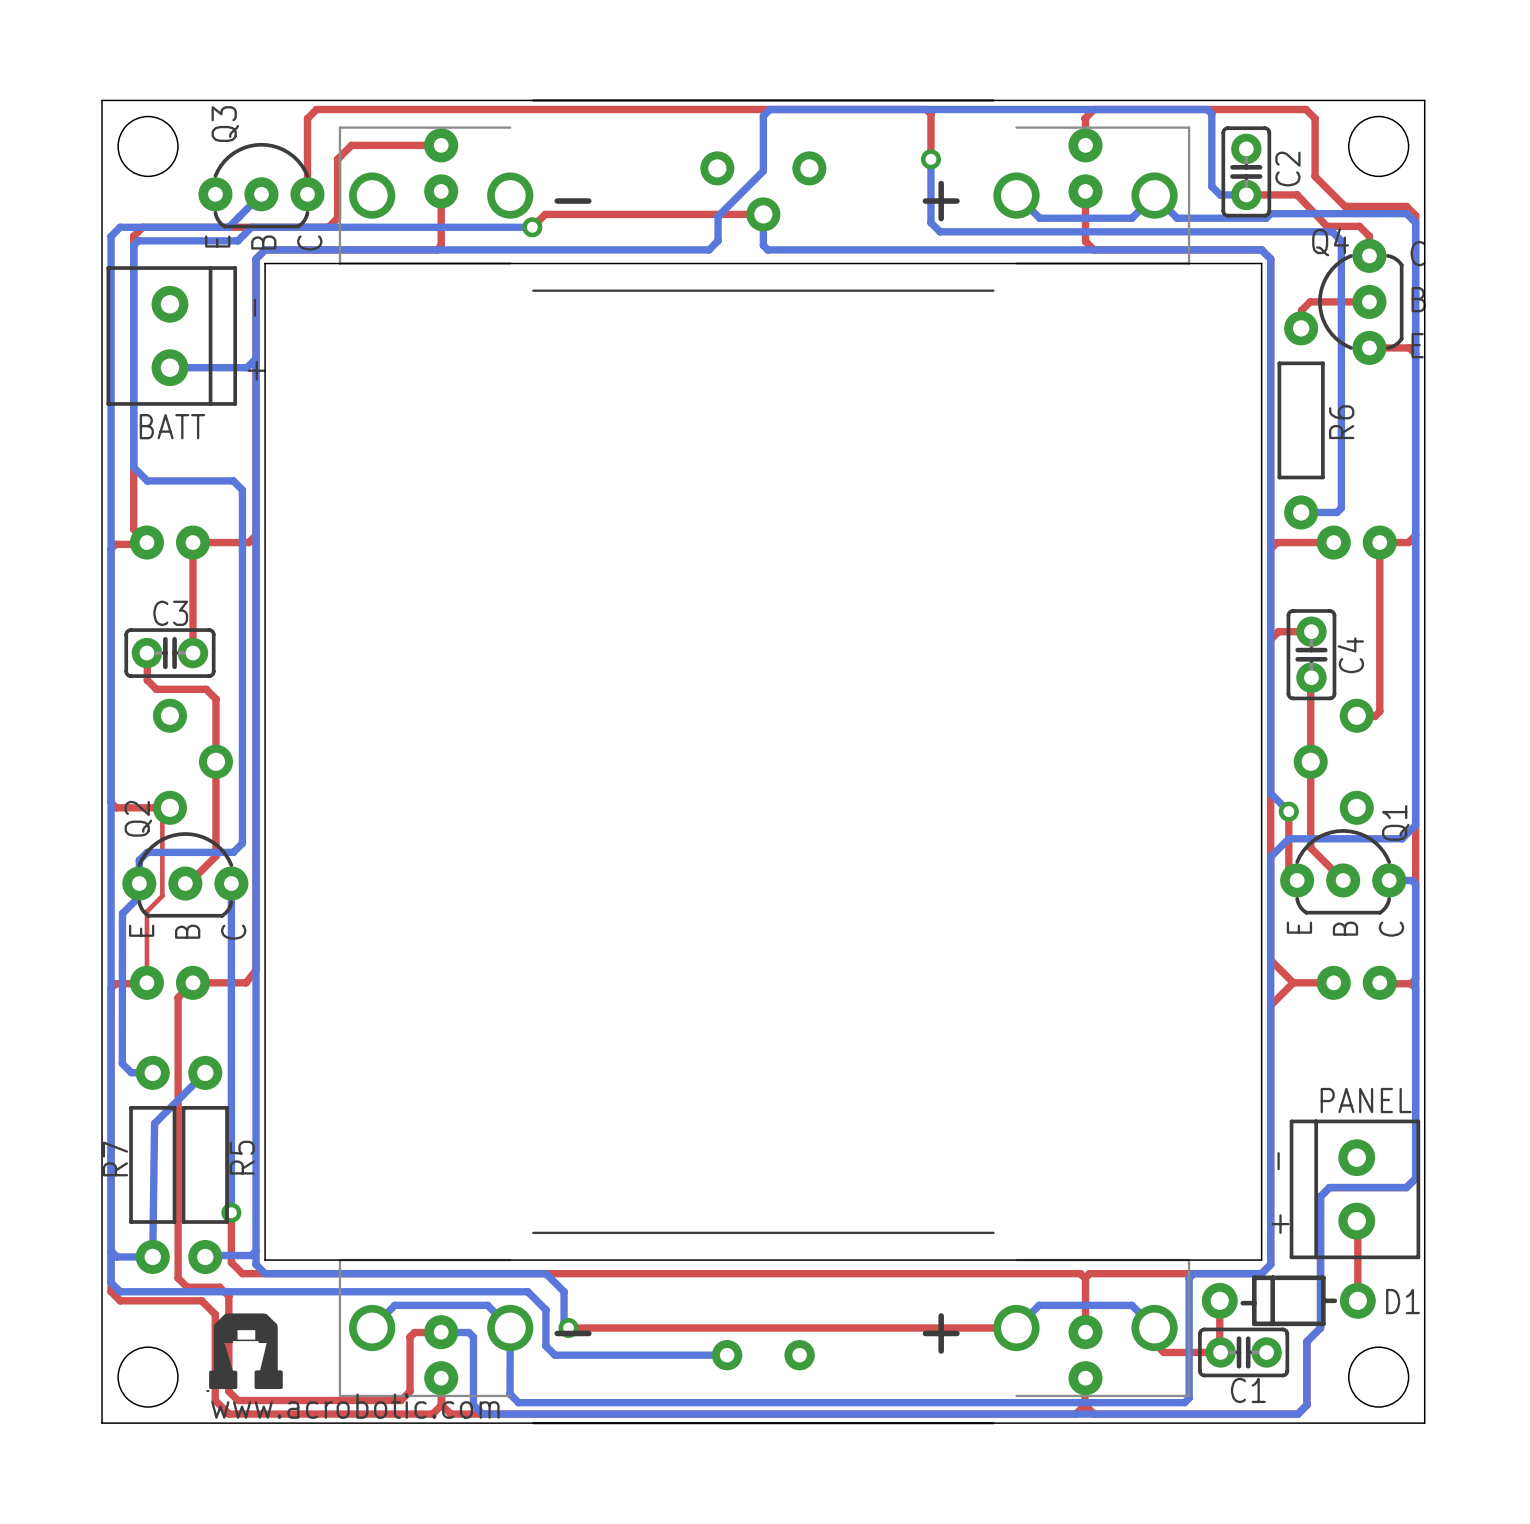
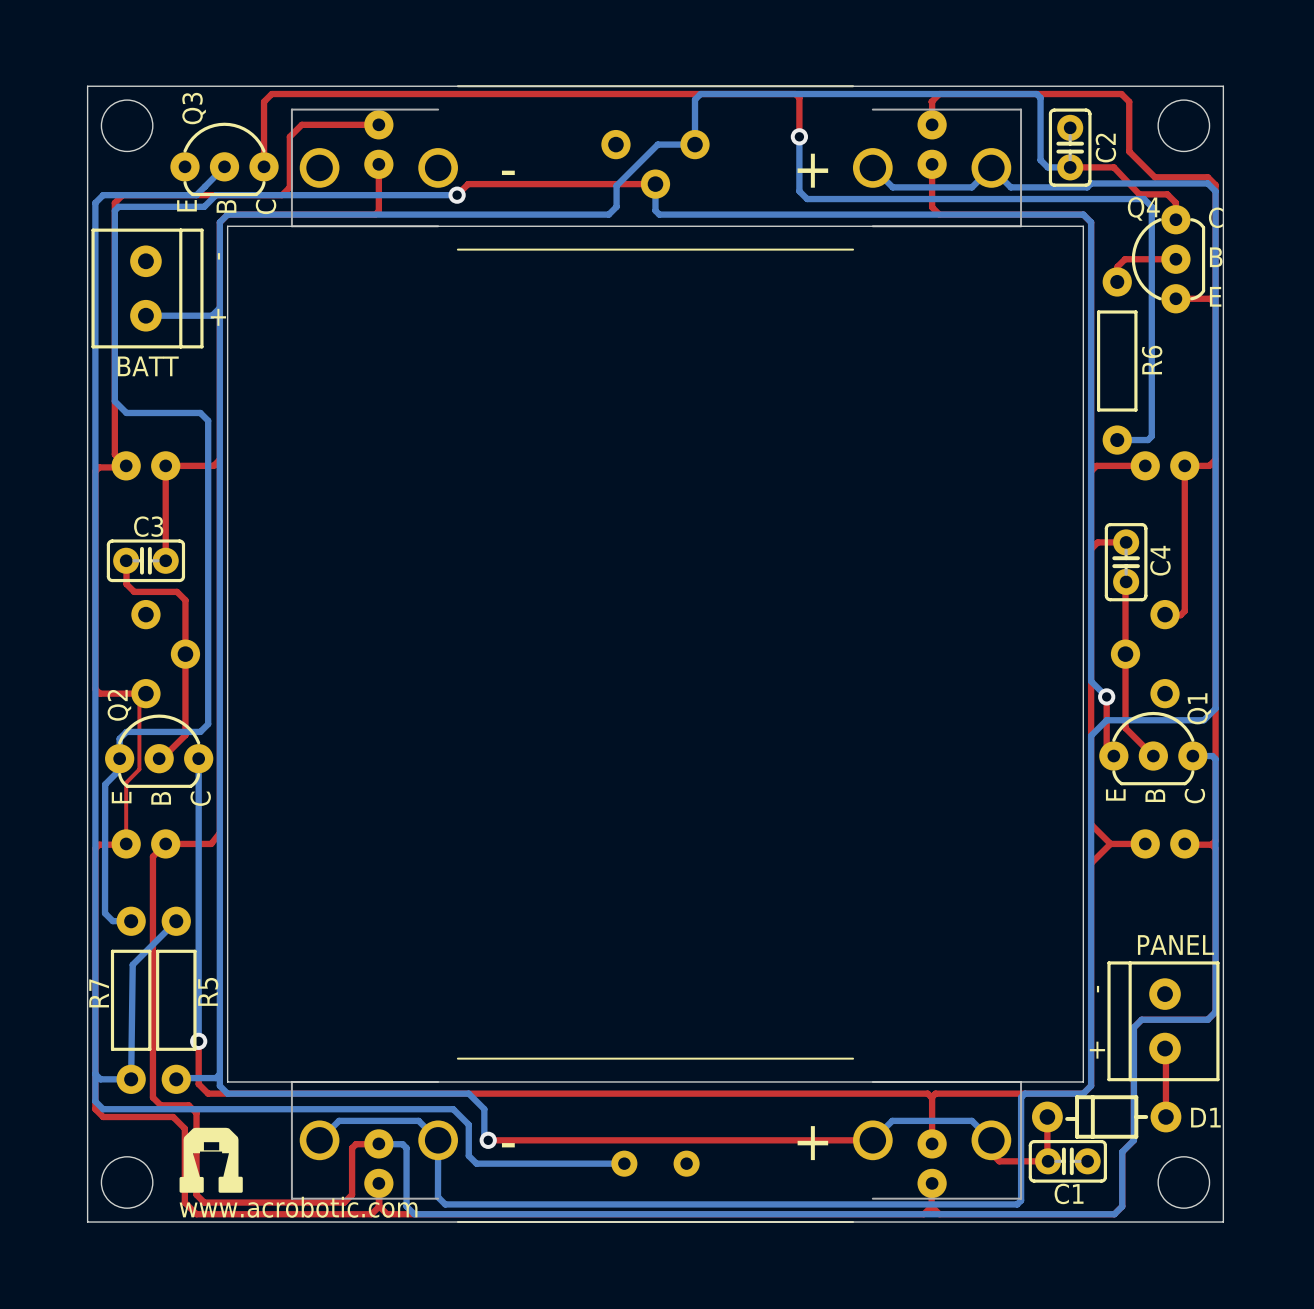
bottom track: (815, 109) (769, 109) (763, 116) (763, 171) -> (700, 94) (695, 99) (695, 144) (657, 144) (655, 146)

